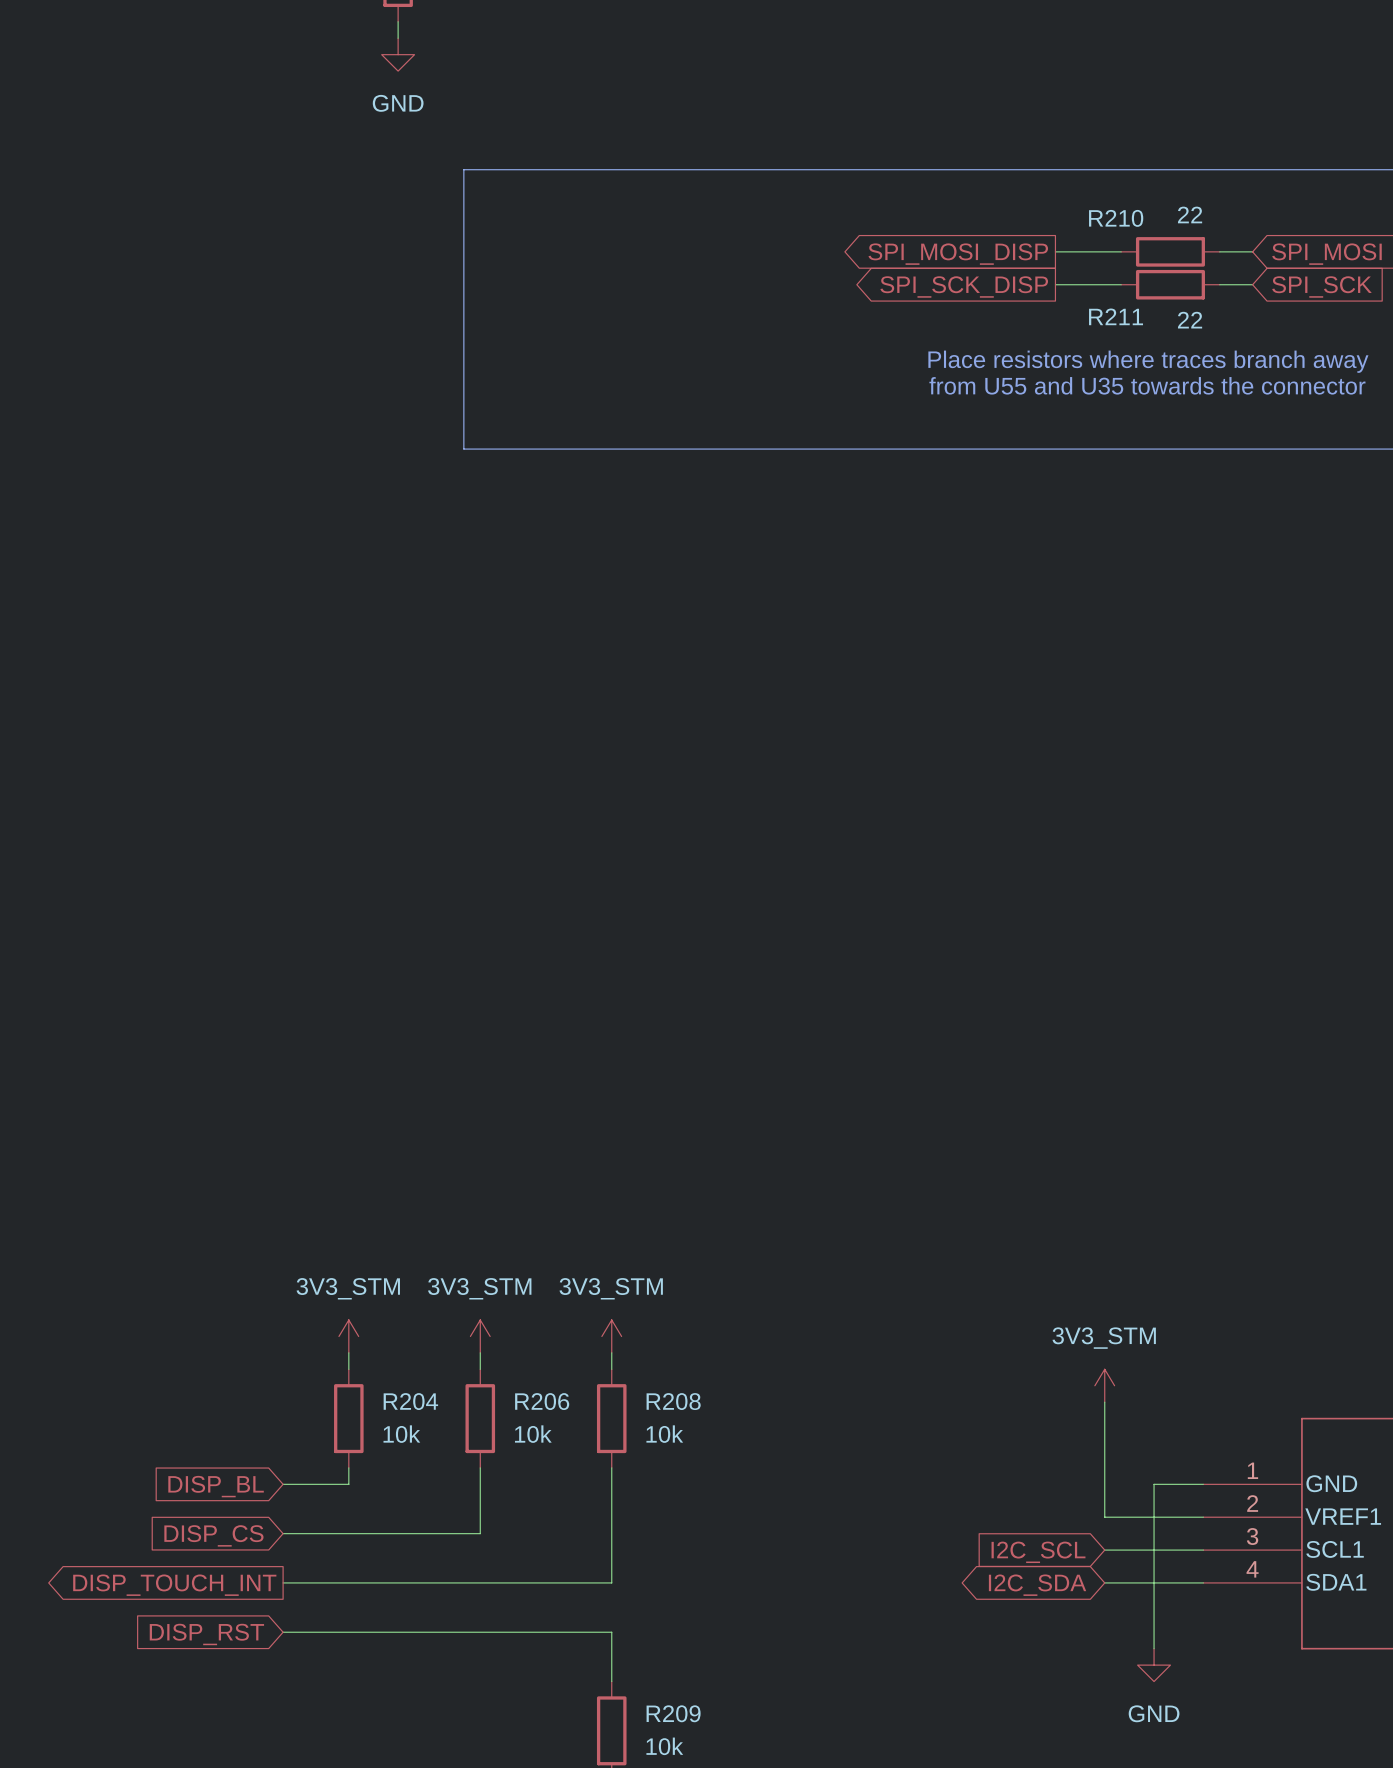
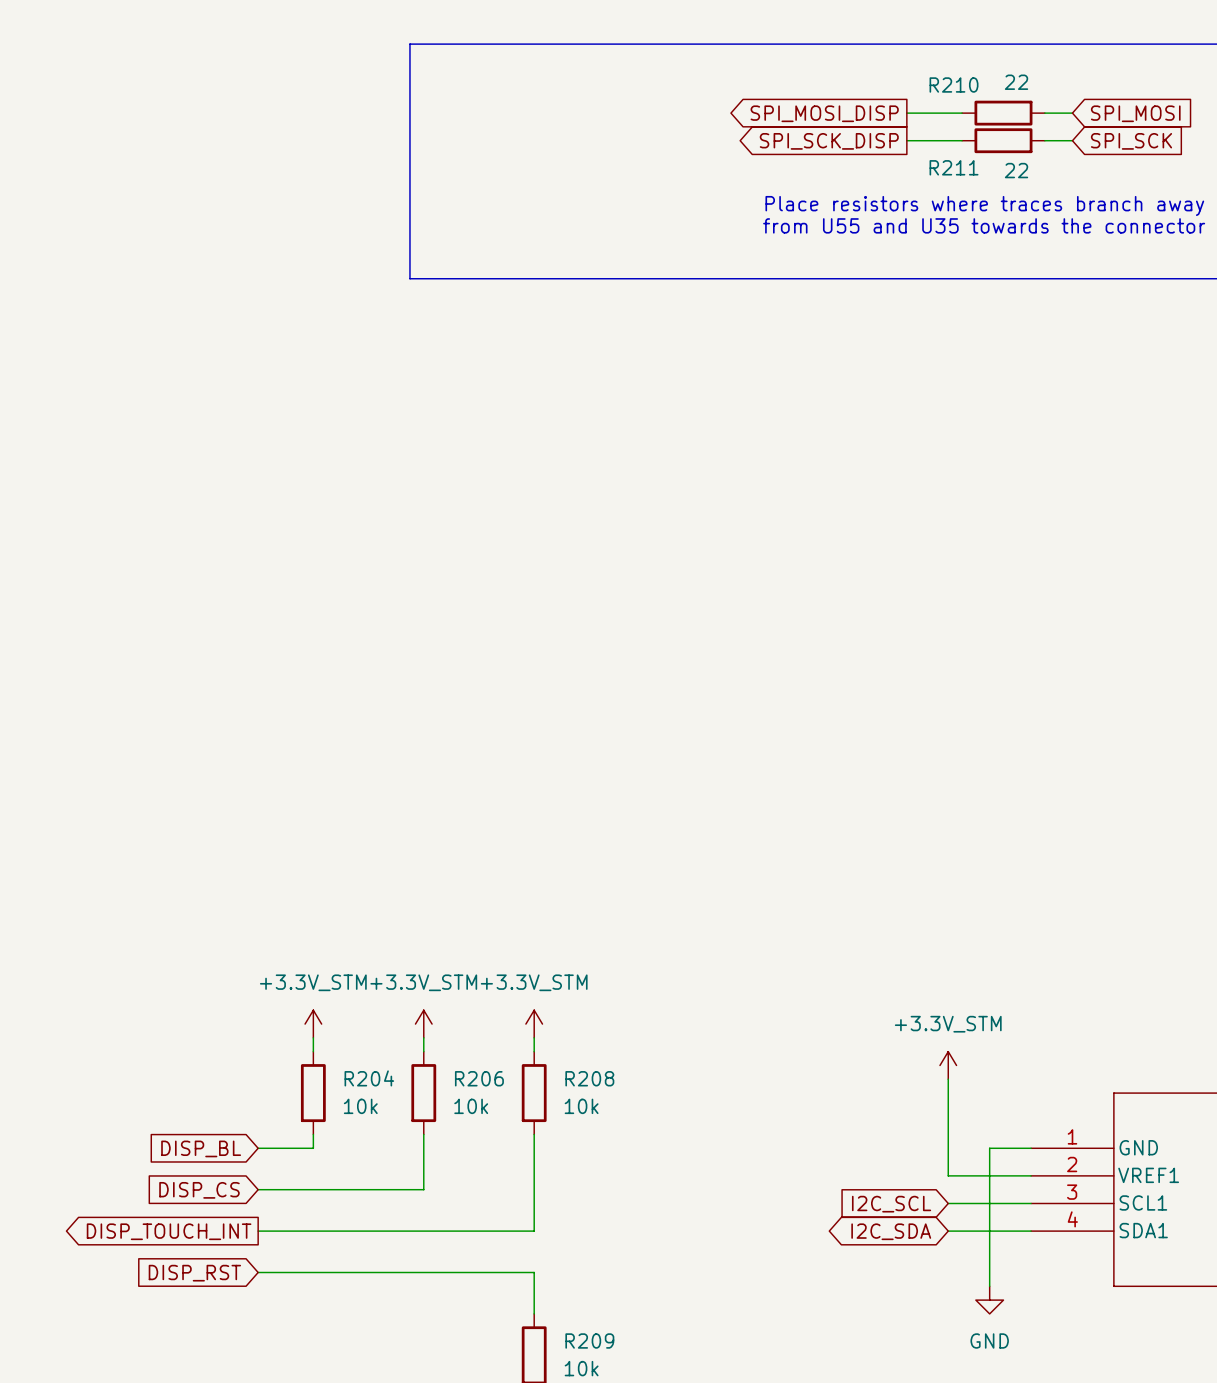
power symbol: 3V3_STM (348, 1336) -> +3.3V_STM (313, 1024)
power symbol: 3V3_STM (480, 1336) -> +3.3V_STM (423, 1024)
power symbol: 3V3_STM (611, 1336) -> +3.3V_STM (534, 1024)
power symbol: 3V3_STM (1104, 1385) -> +3.3V_STM (948, 1065)

